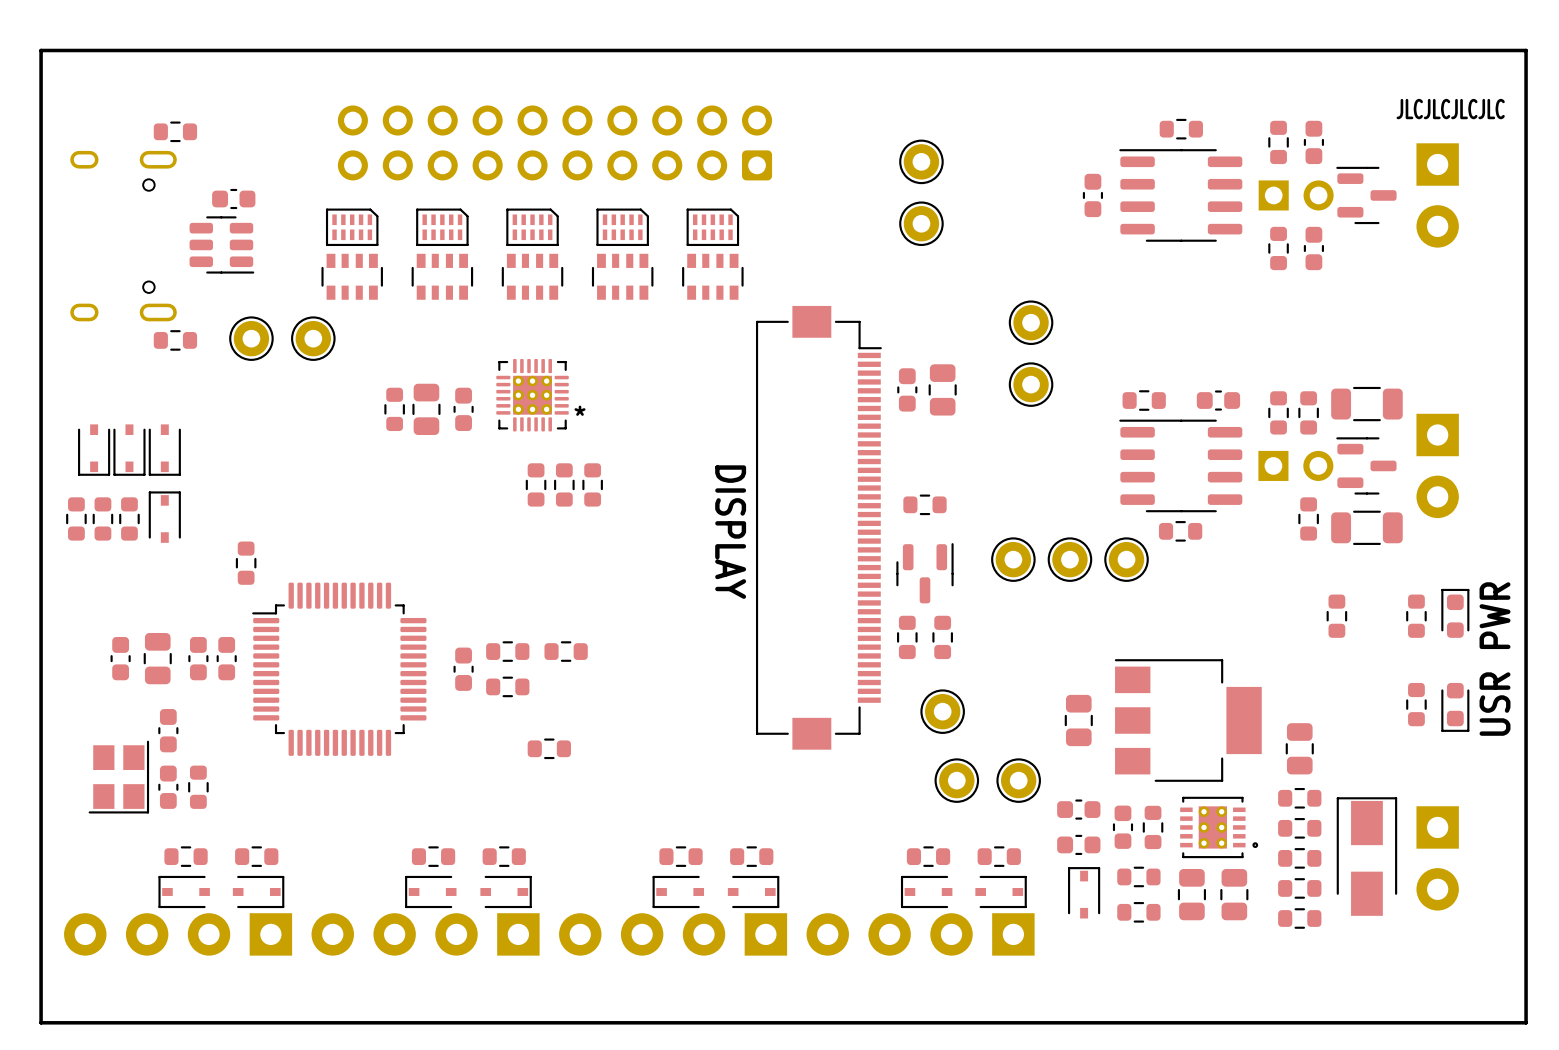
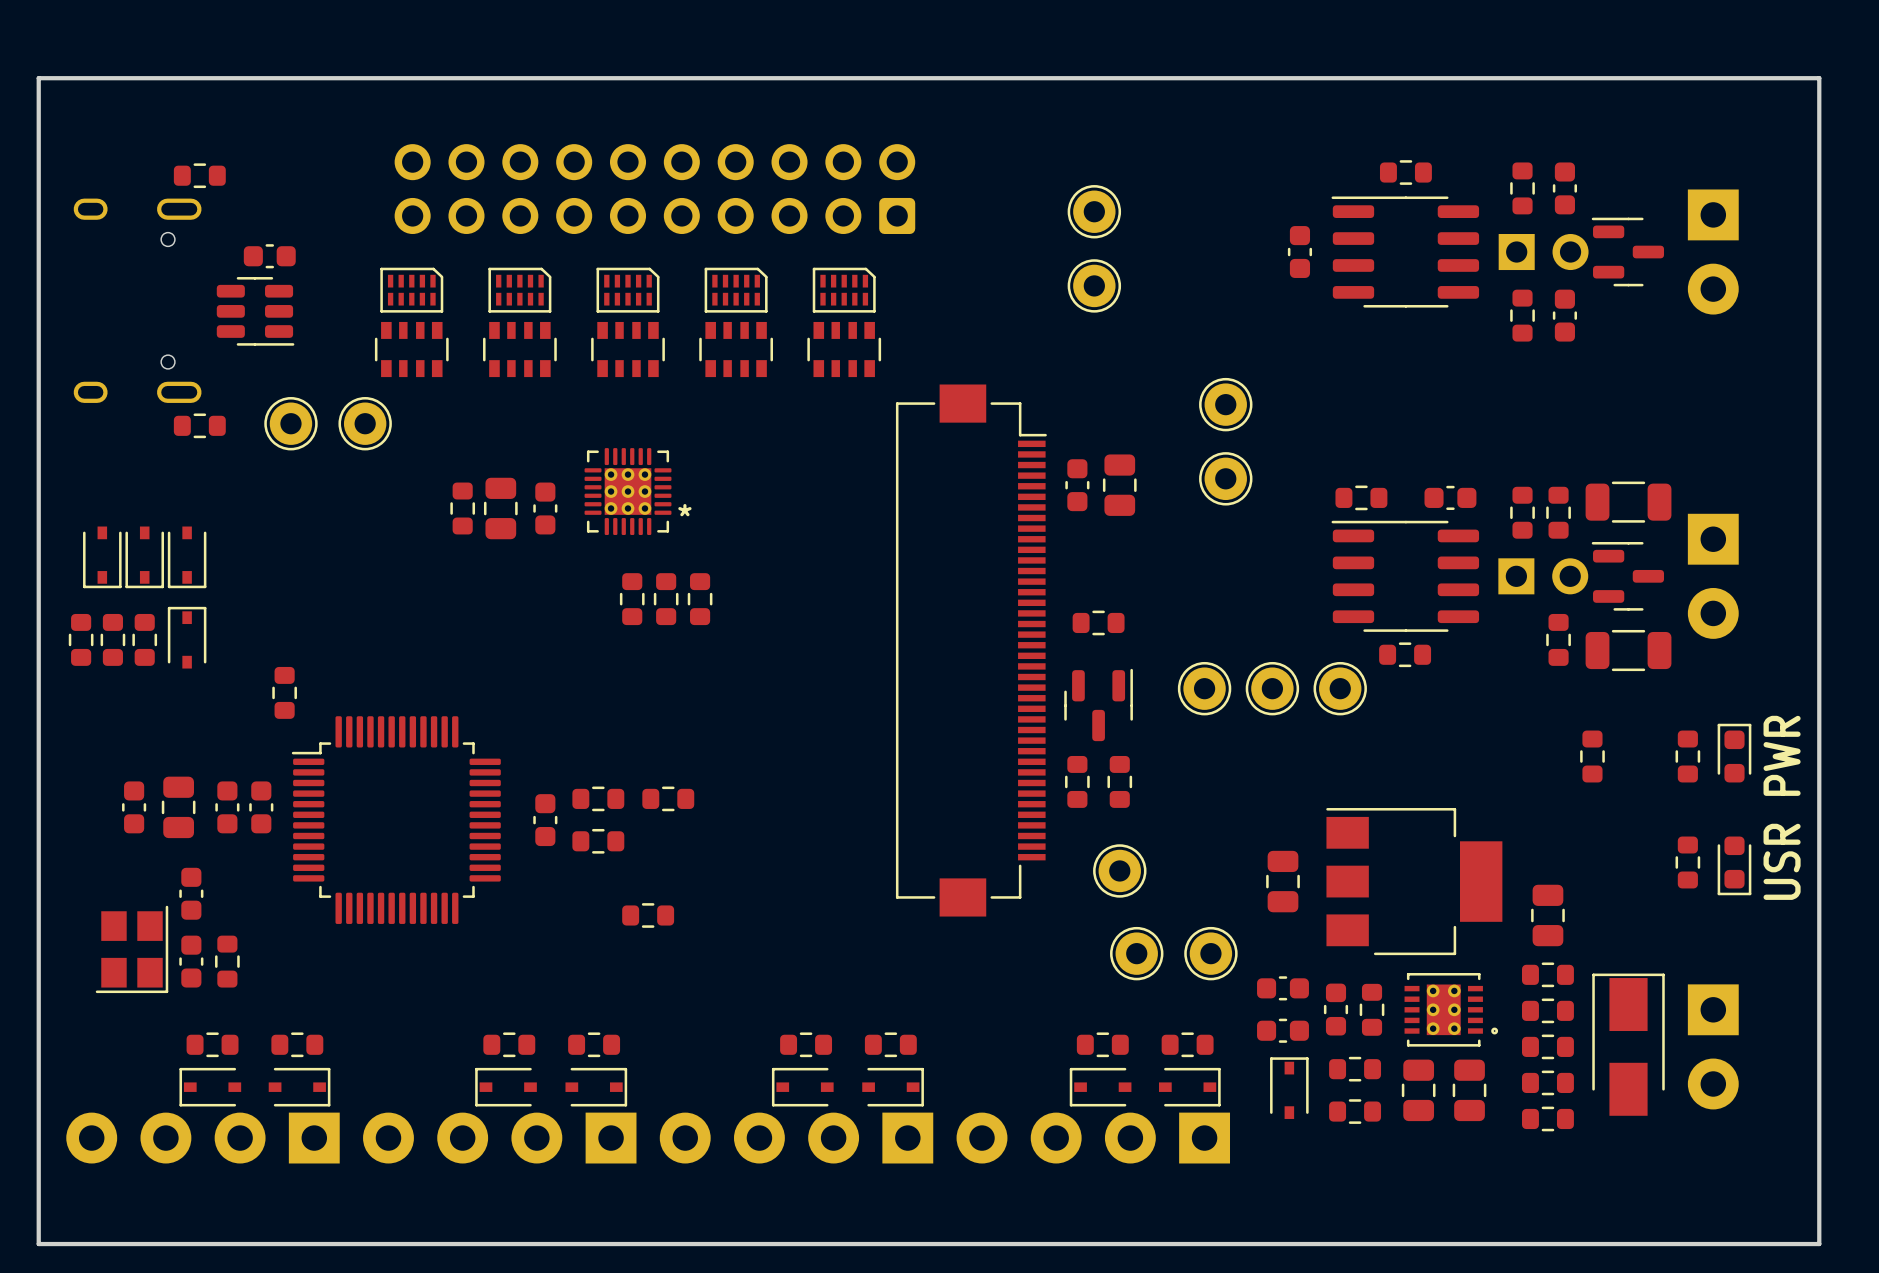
text: JLCJLCJLCJLC (1450, 109) -> none
text: DISPLAY (730, 532) -> none

